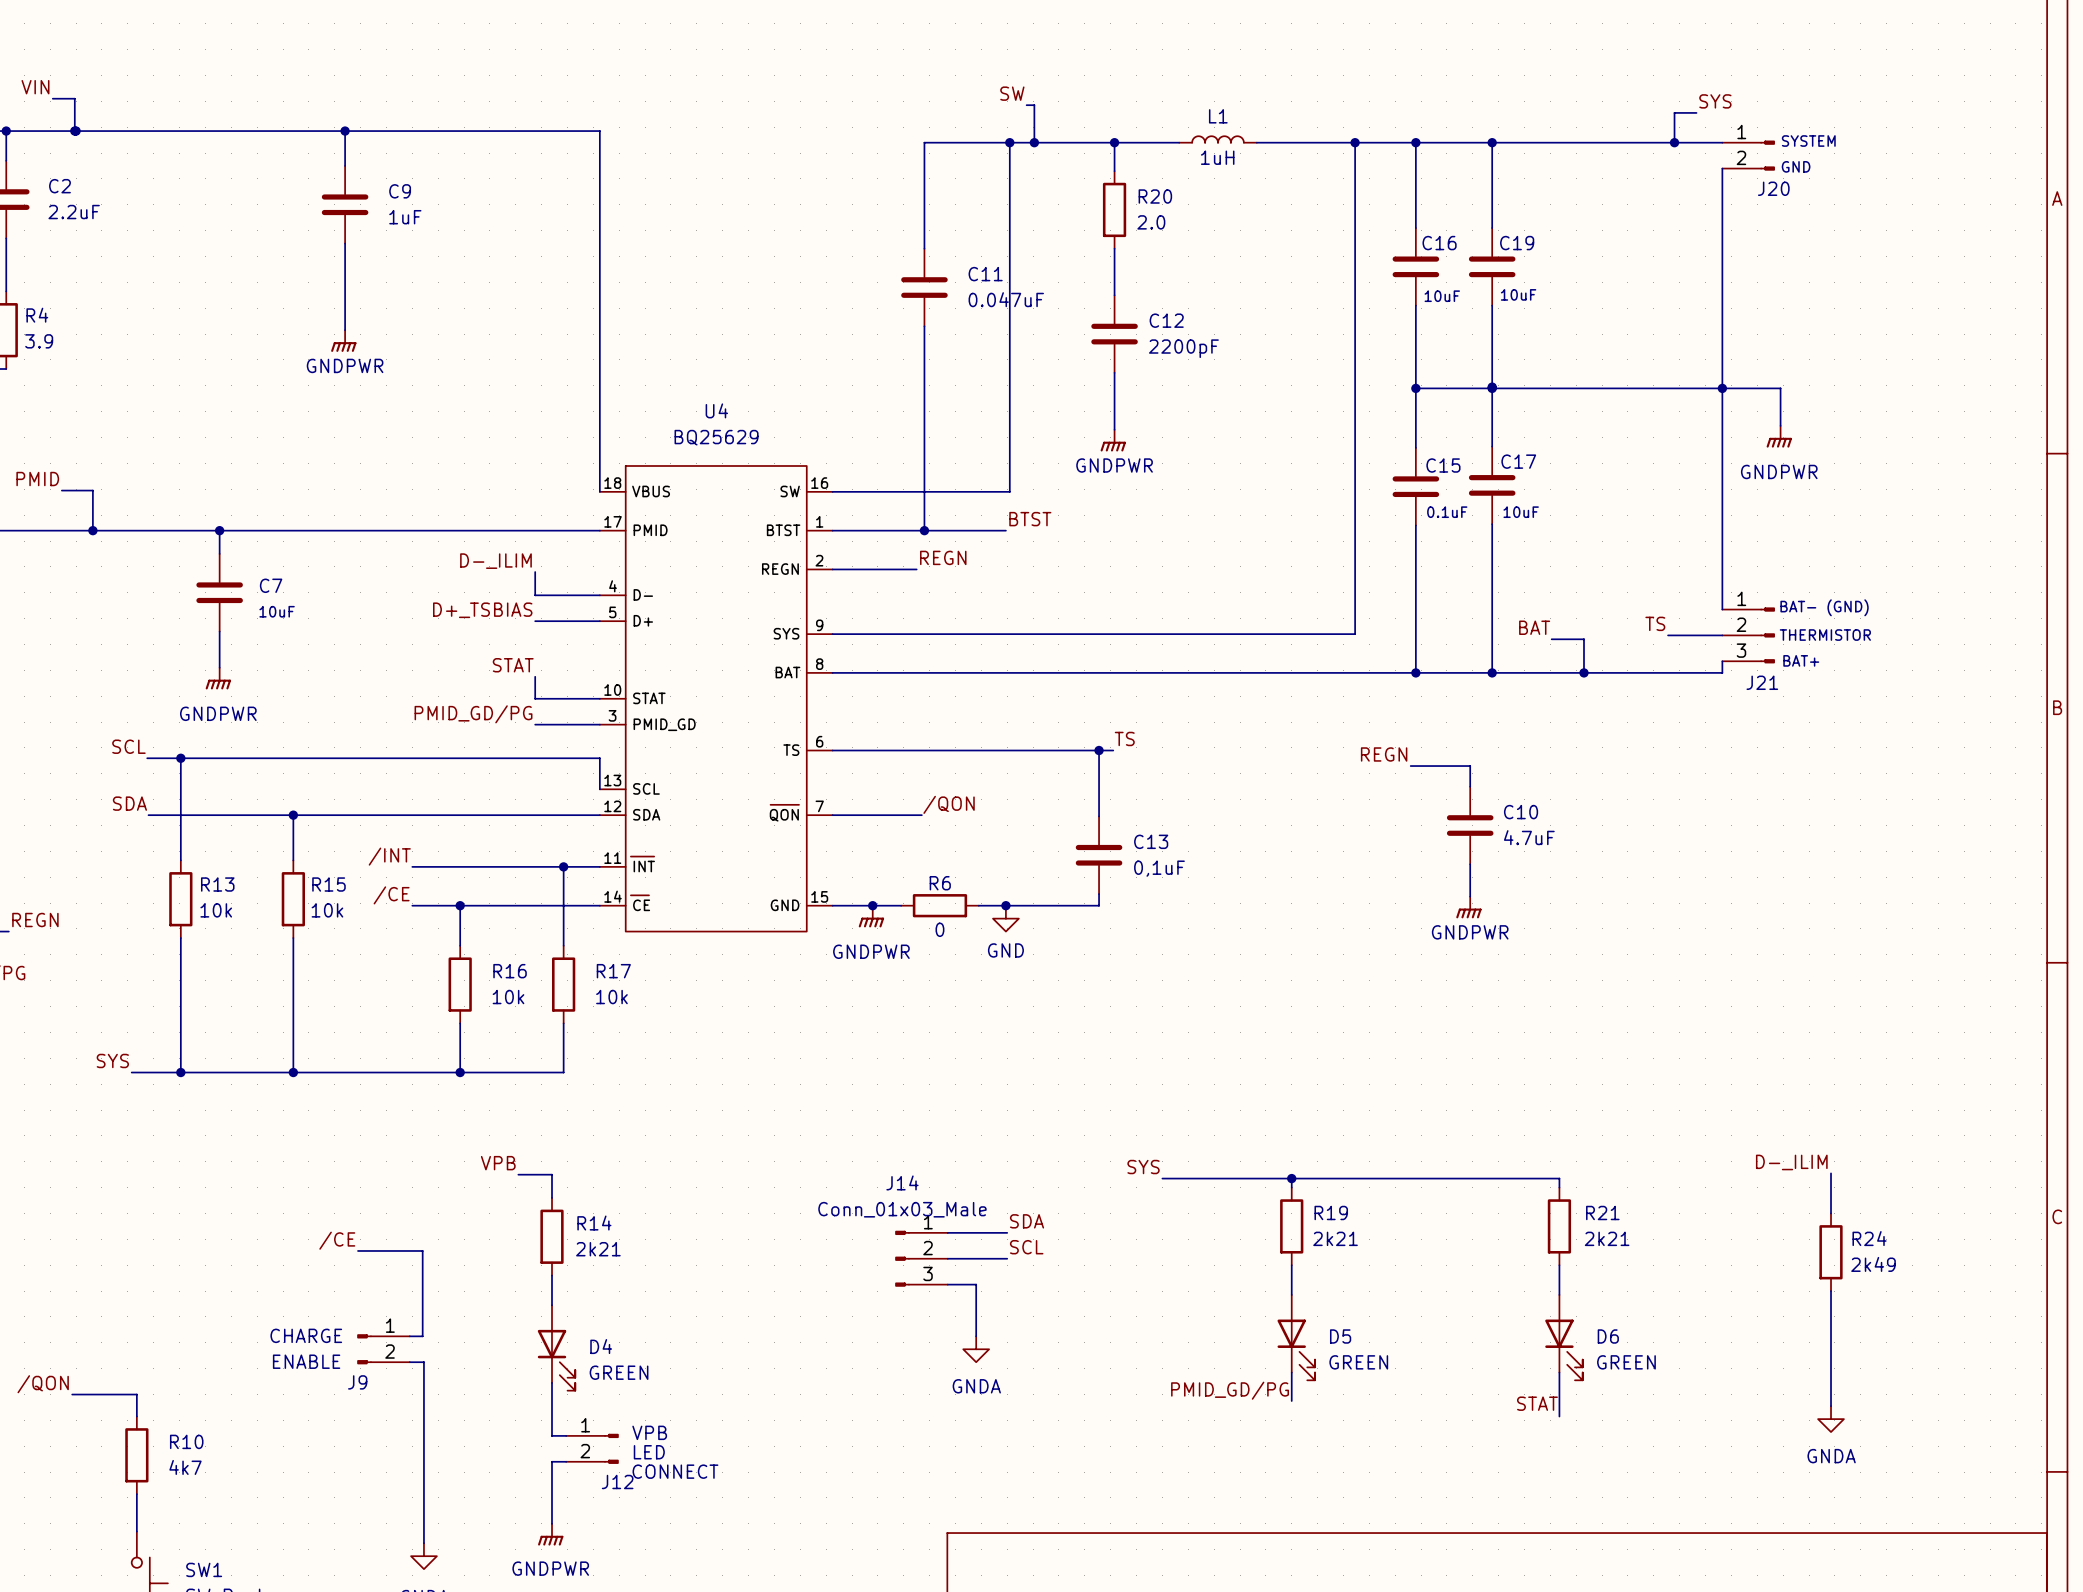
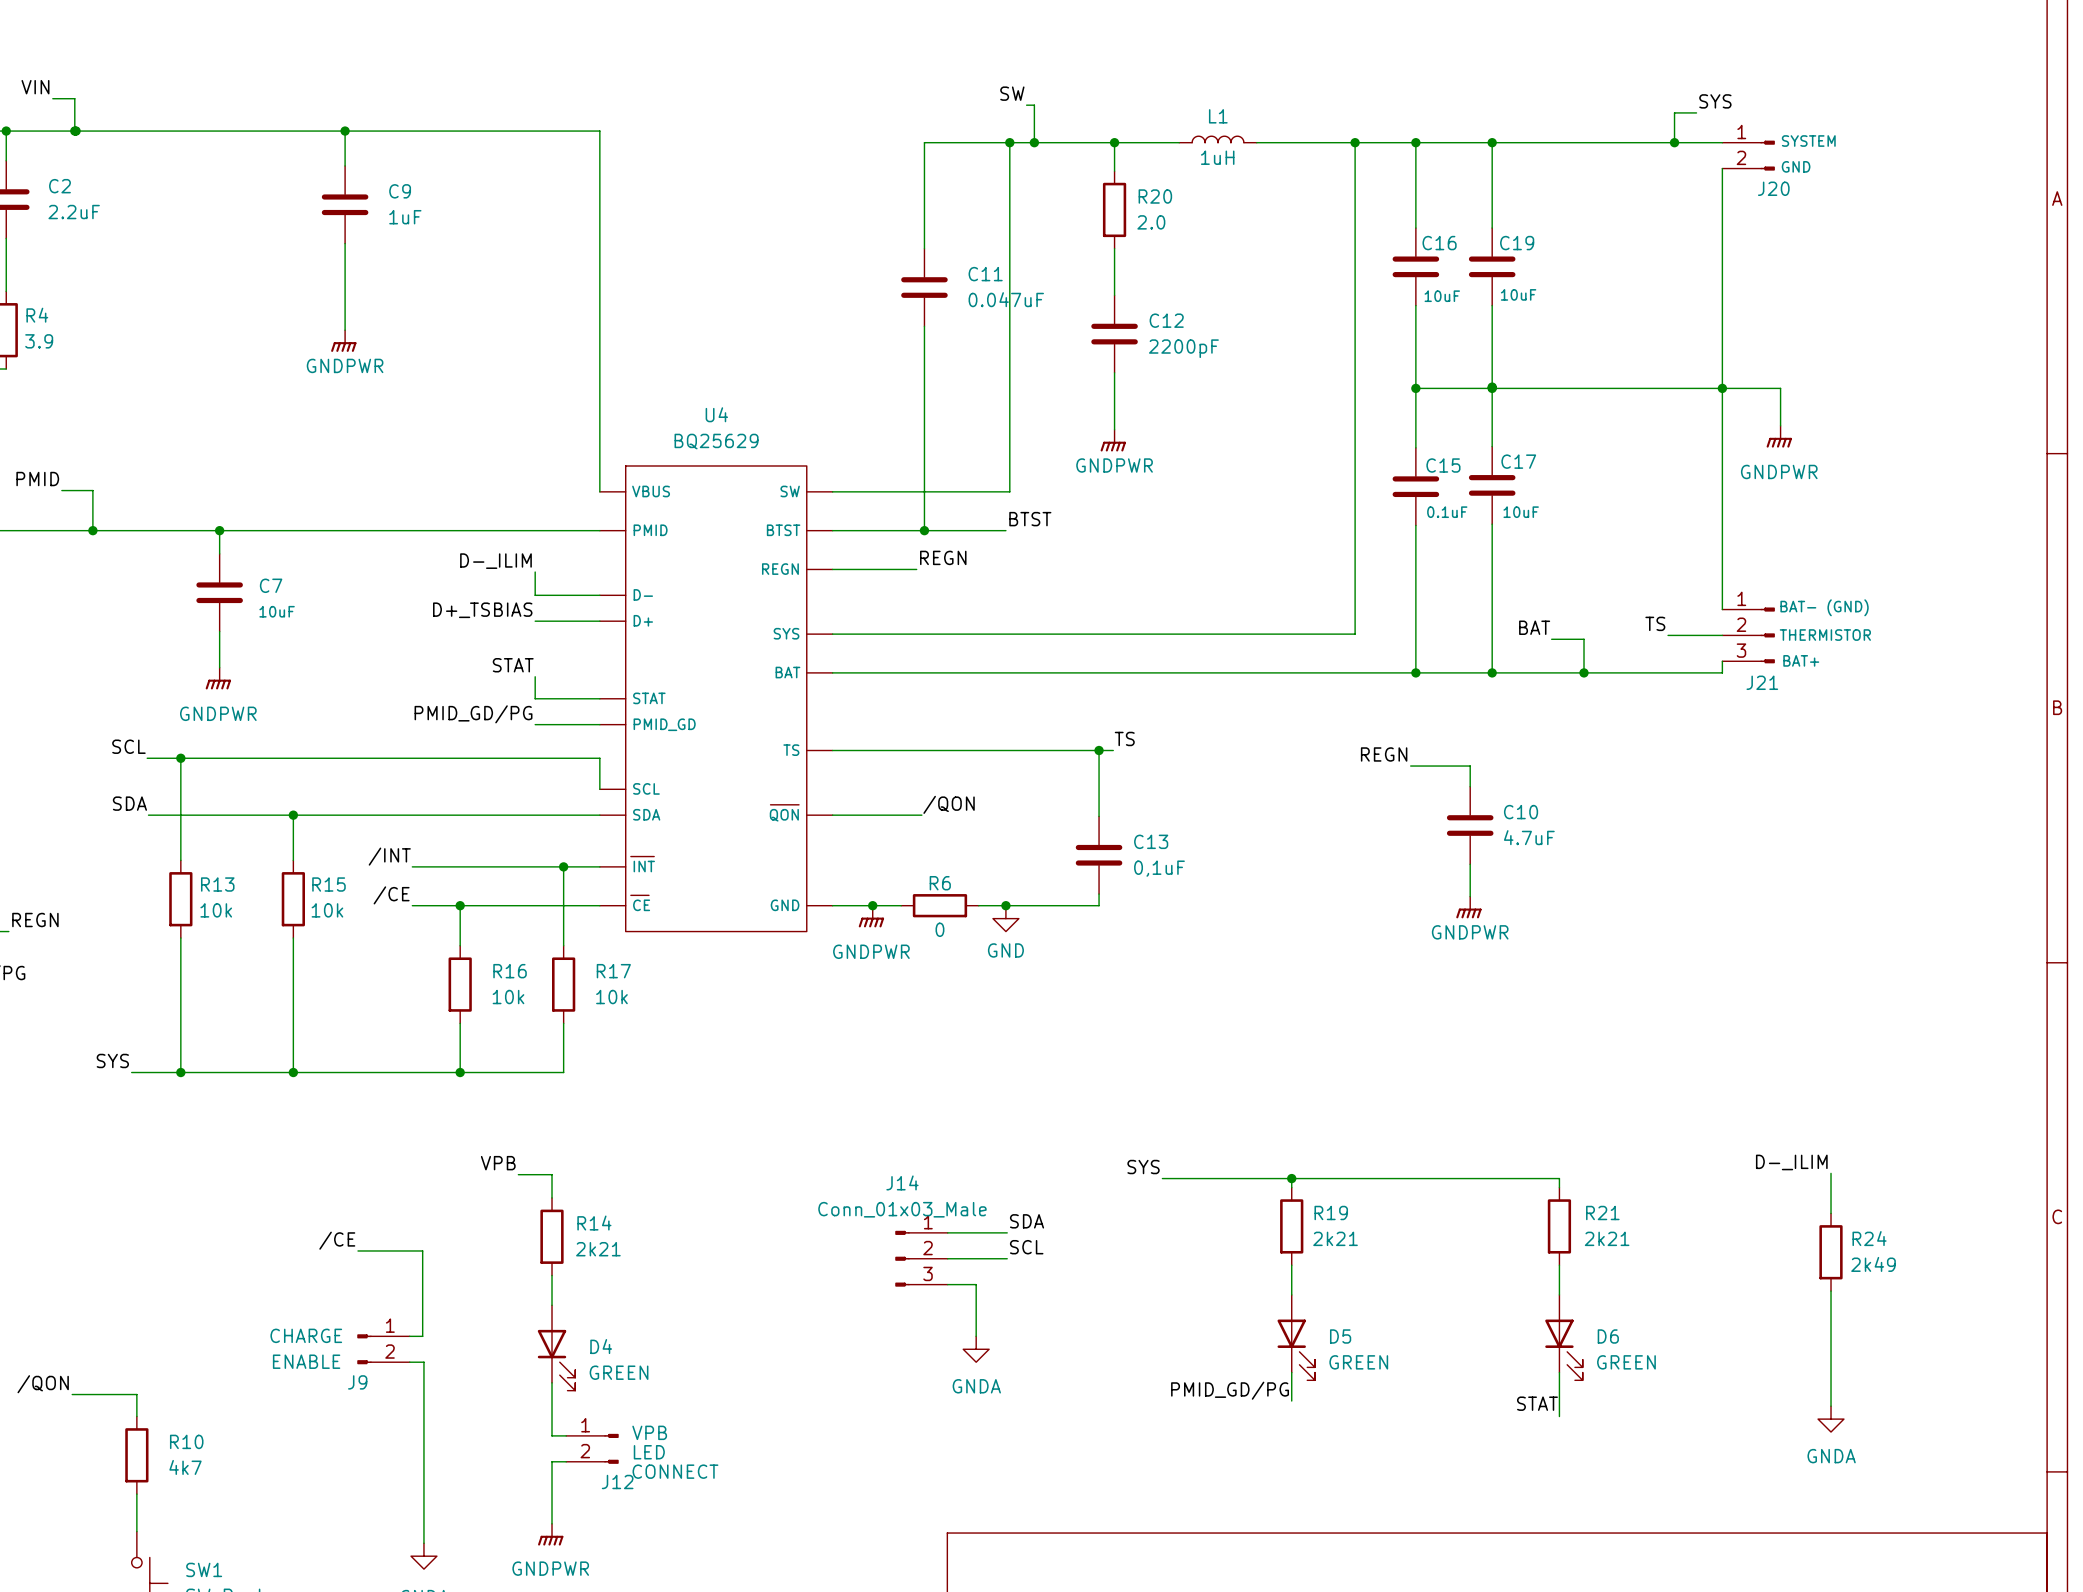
U4 symbol: [599, 465, 833, 932] -> [599, 465, 833, 932]

